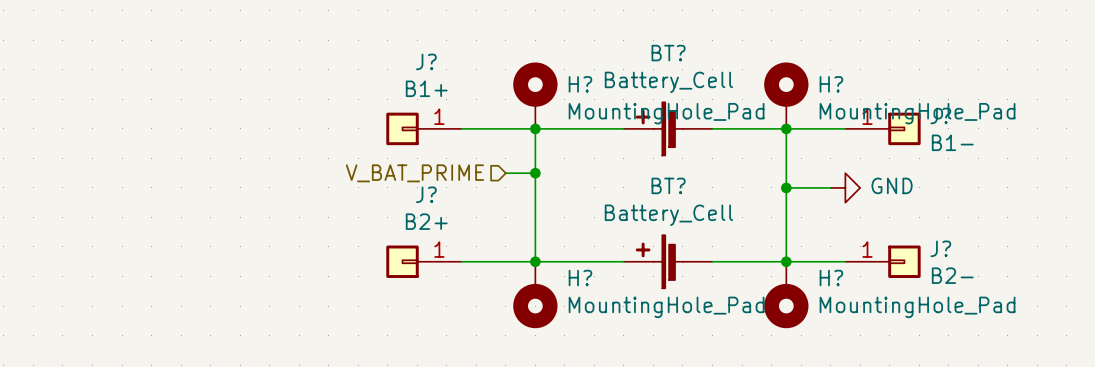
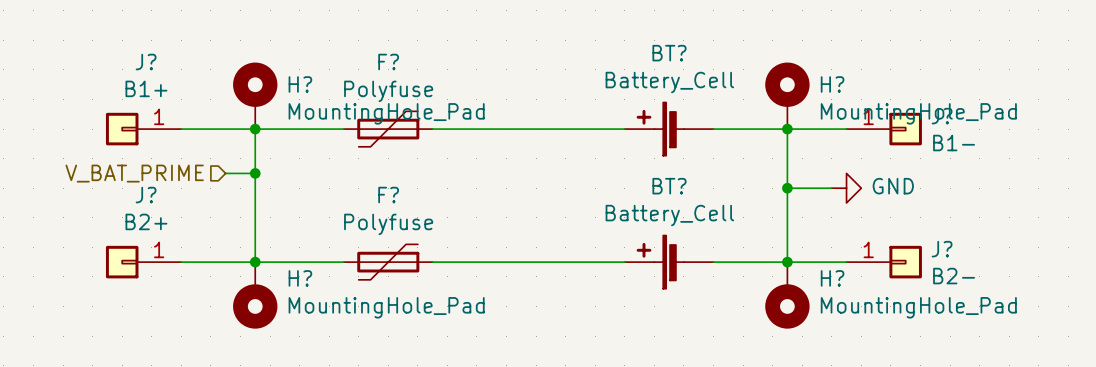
H?: none -> MountingHole_Pad (255, 95)
H?: MountingHole_Pad (535, 95) -> none
wire: none -> (181, 129) (343, 129)
junction: none -> (255, 129)
F?: none -> Polyfuse (388, 129)
J? position: (423, 128) -> (143, 129)
wire: (535, 128) (535, 261) -> (255, 129) (255, 262)
junction: (535, 128) -> none
junction: none -> (255, 173)
hierarchical label position: V_BAT_PRIME (414, 173) -> V_BAT_PRIME (134, 173)
wire: (505, 173) (535, 173) -> (225, 173) (255, 173)
junction: (535, 173) -> none
wire: none -> (181, 262) (343, 262)
junction: none -> (255, 262)
F?: none -> Polyfuse (388, 262)
J? position: (423, 261) -> (143, 262)
junction: (535, 261) -> none
H?: none -> MountingHole_Pad (255, 295)
H?: MountingHole_Pad (535, 294) -> none

